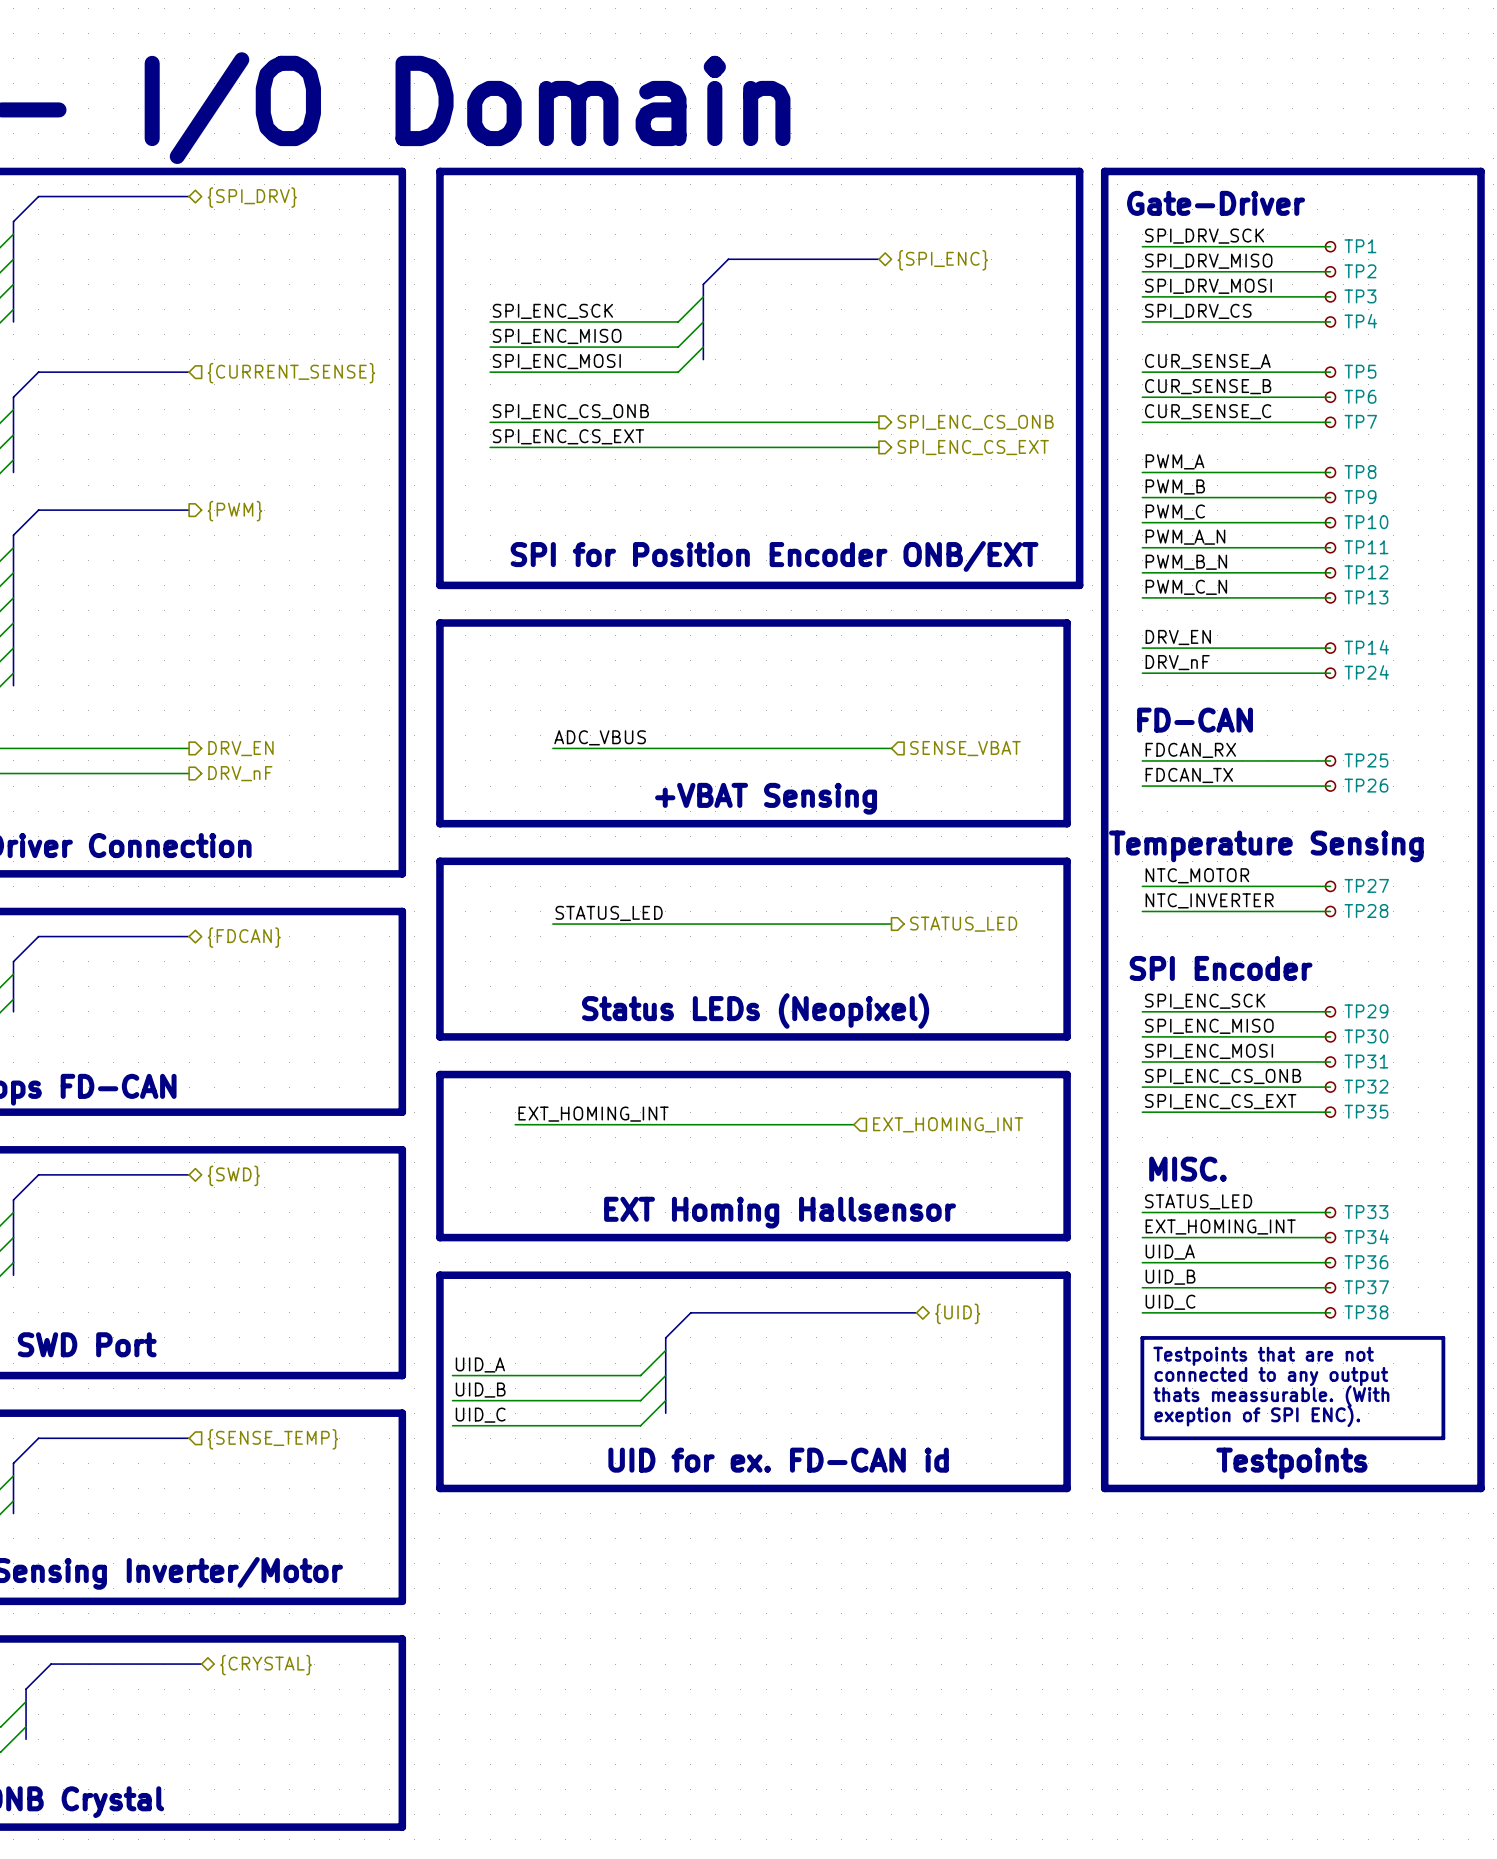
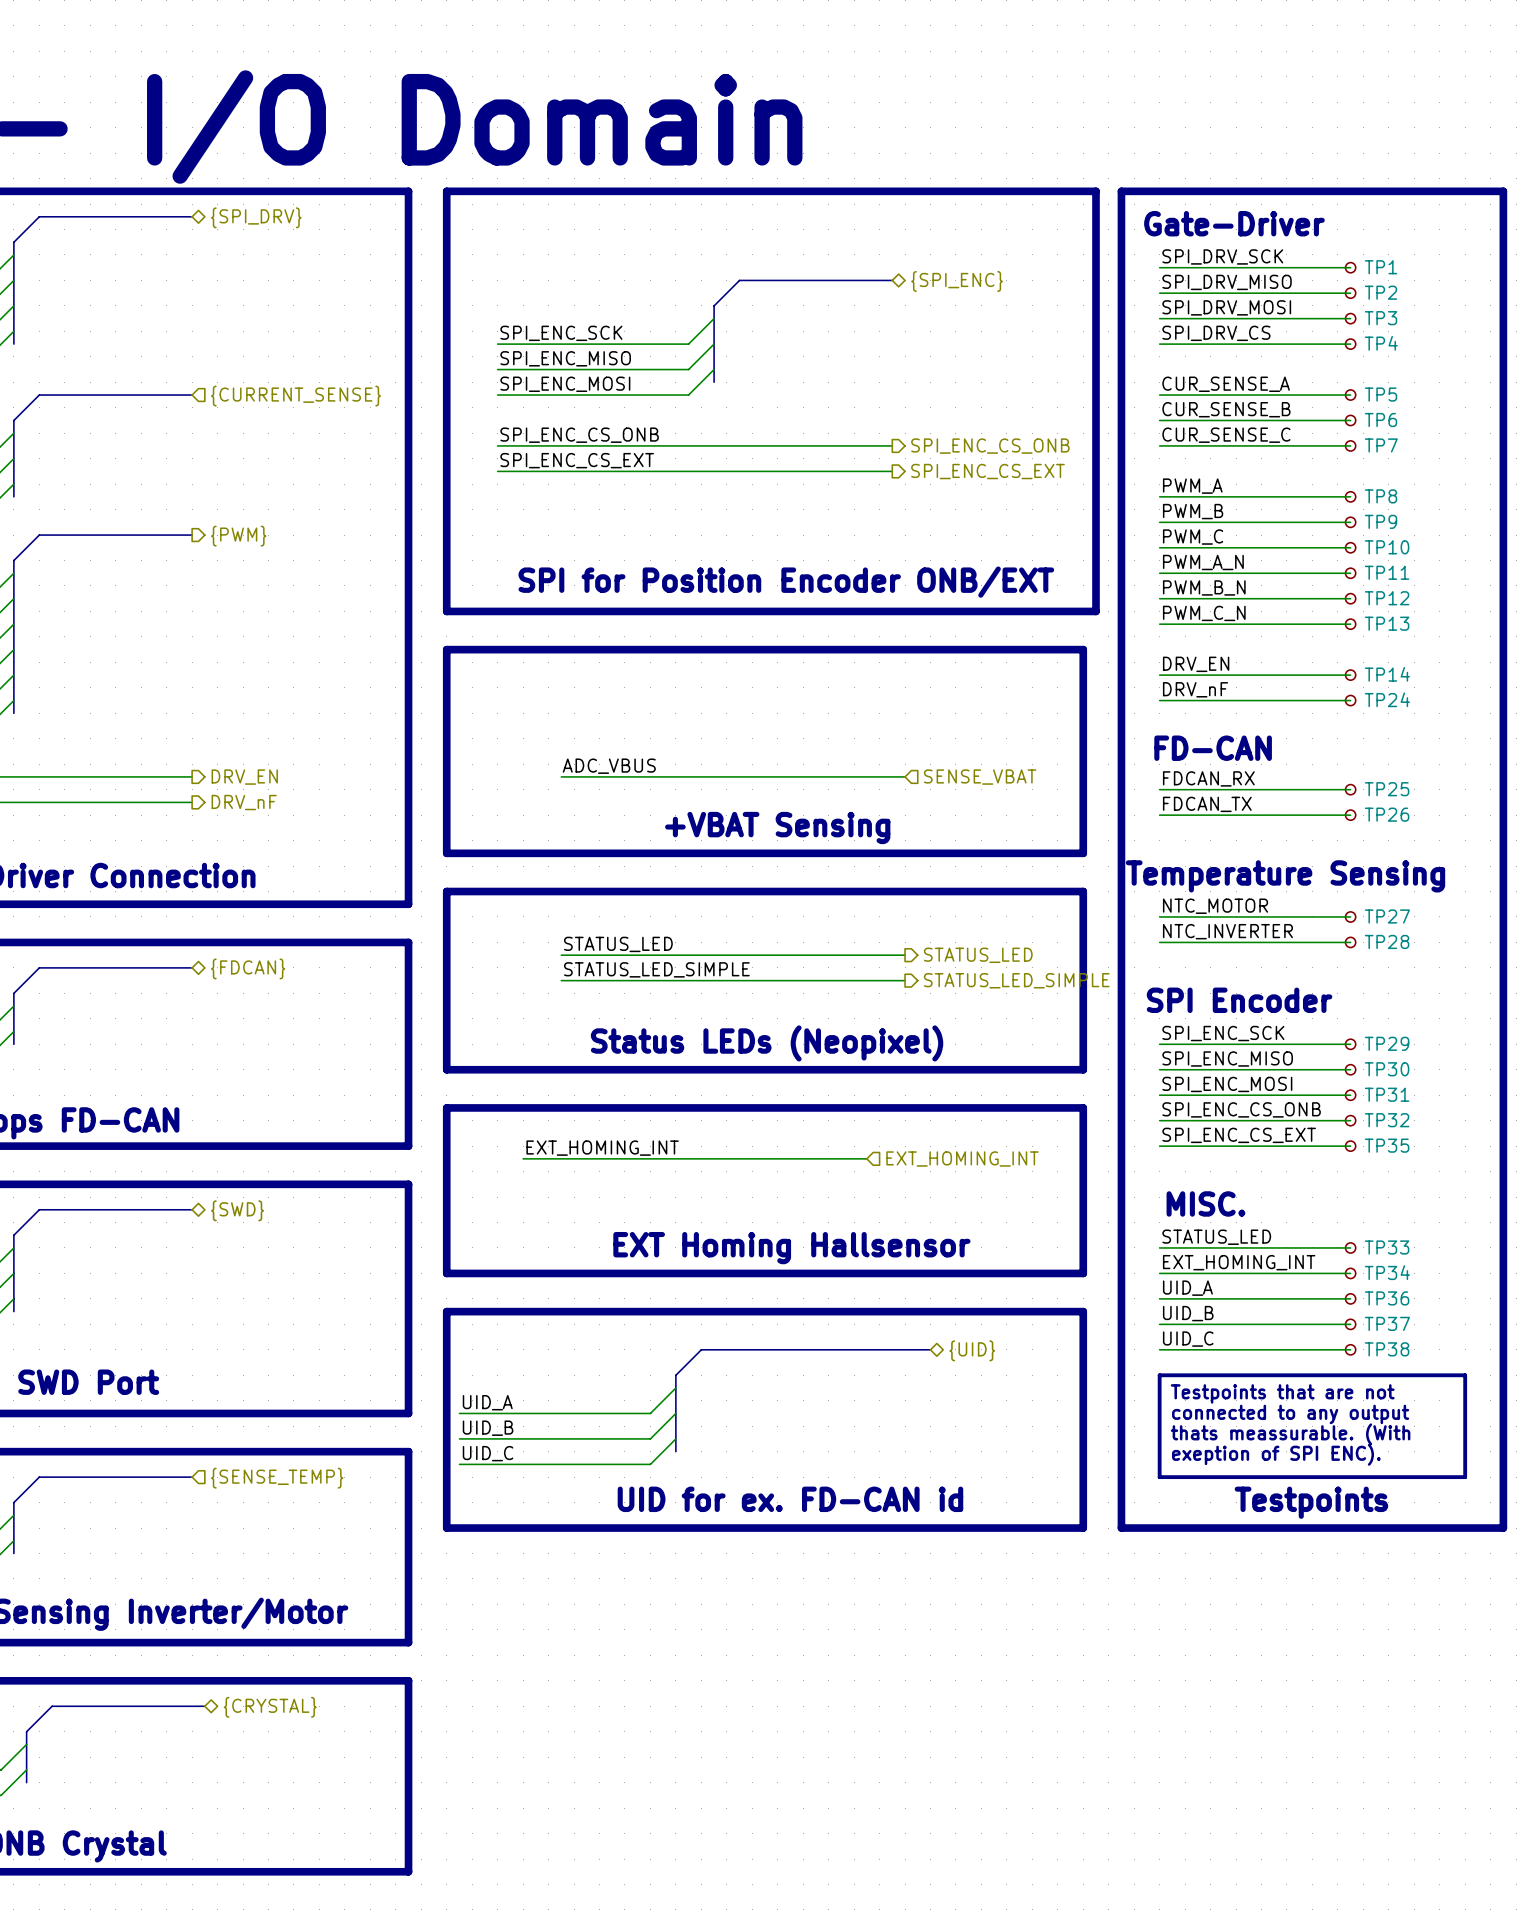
label: none -> STATUS_LED_SIMPLE (656, 969)
wire: none -> (561, 980) (905, 980)
hierarchical label: none -> STATUS_LED_SIMPLE (1016, 980)

